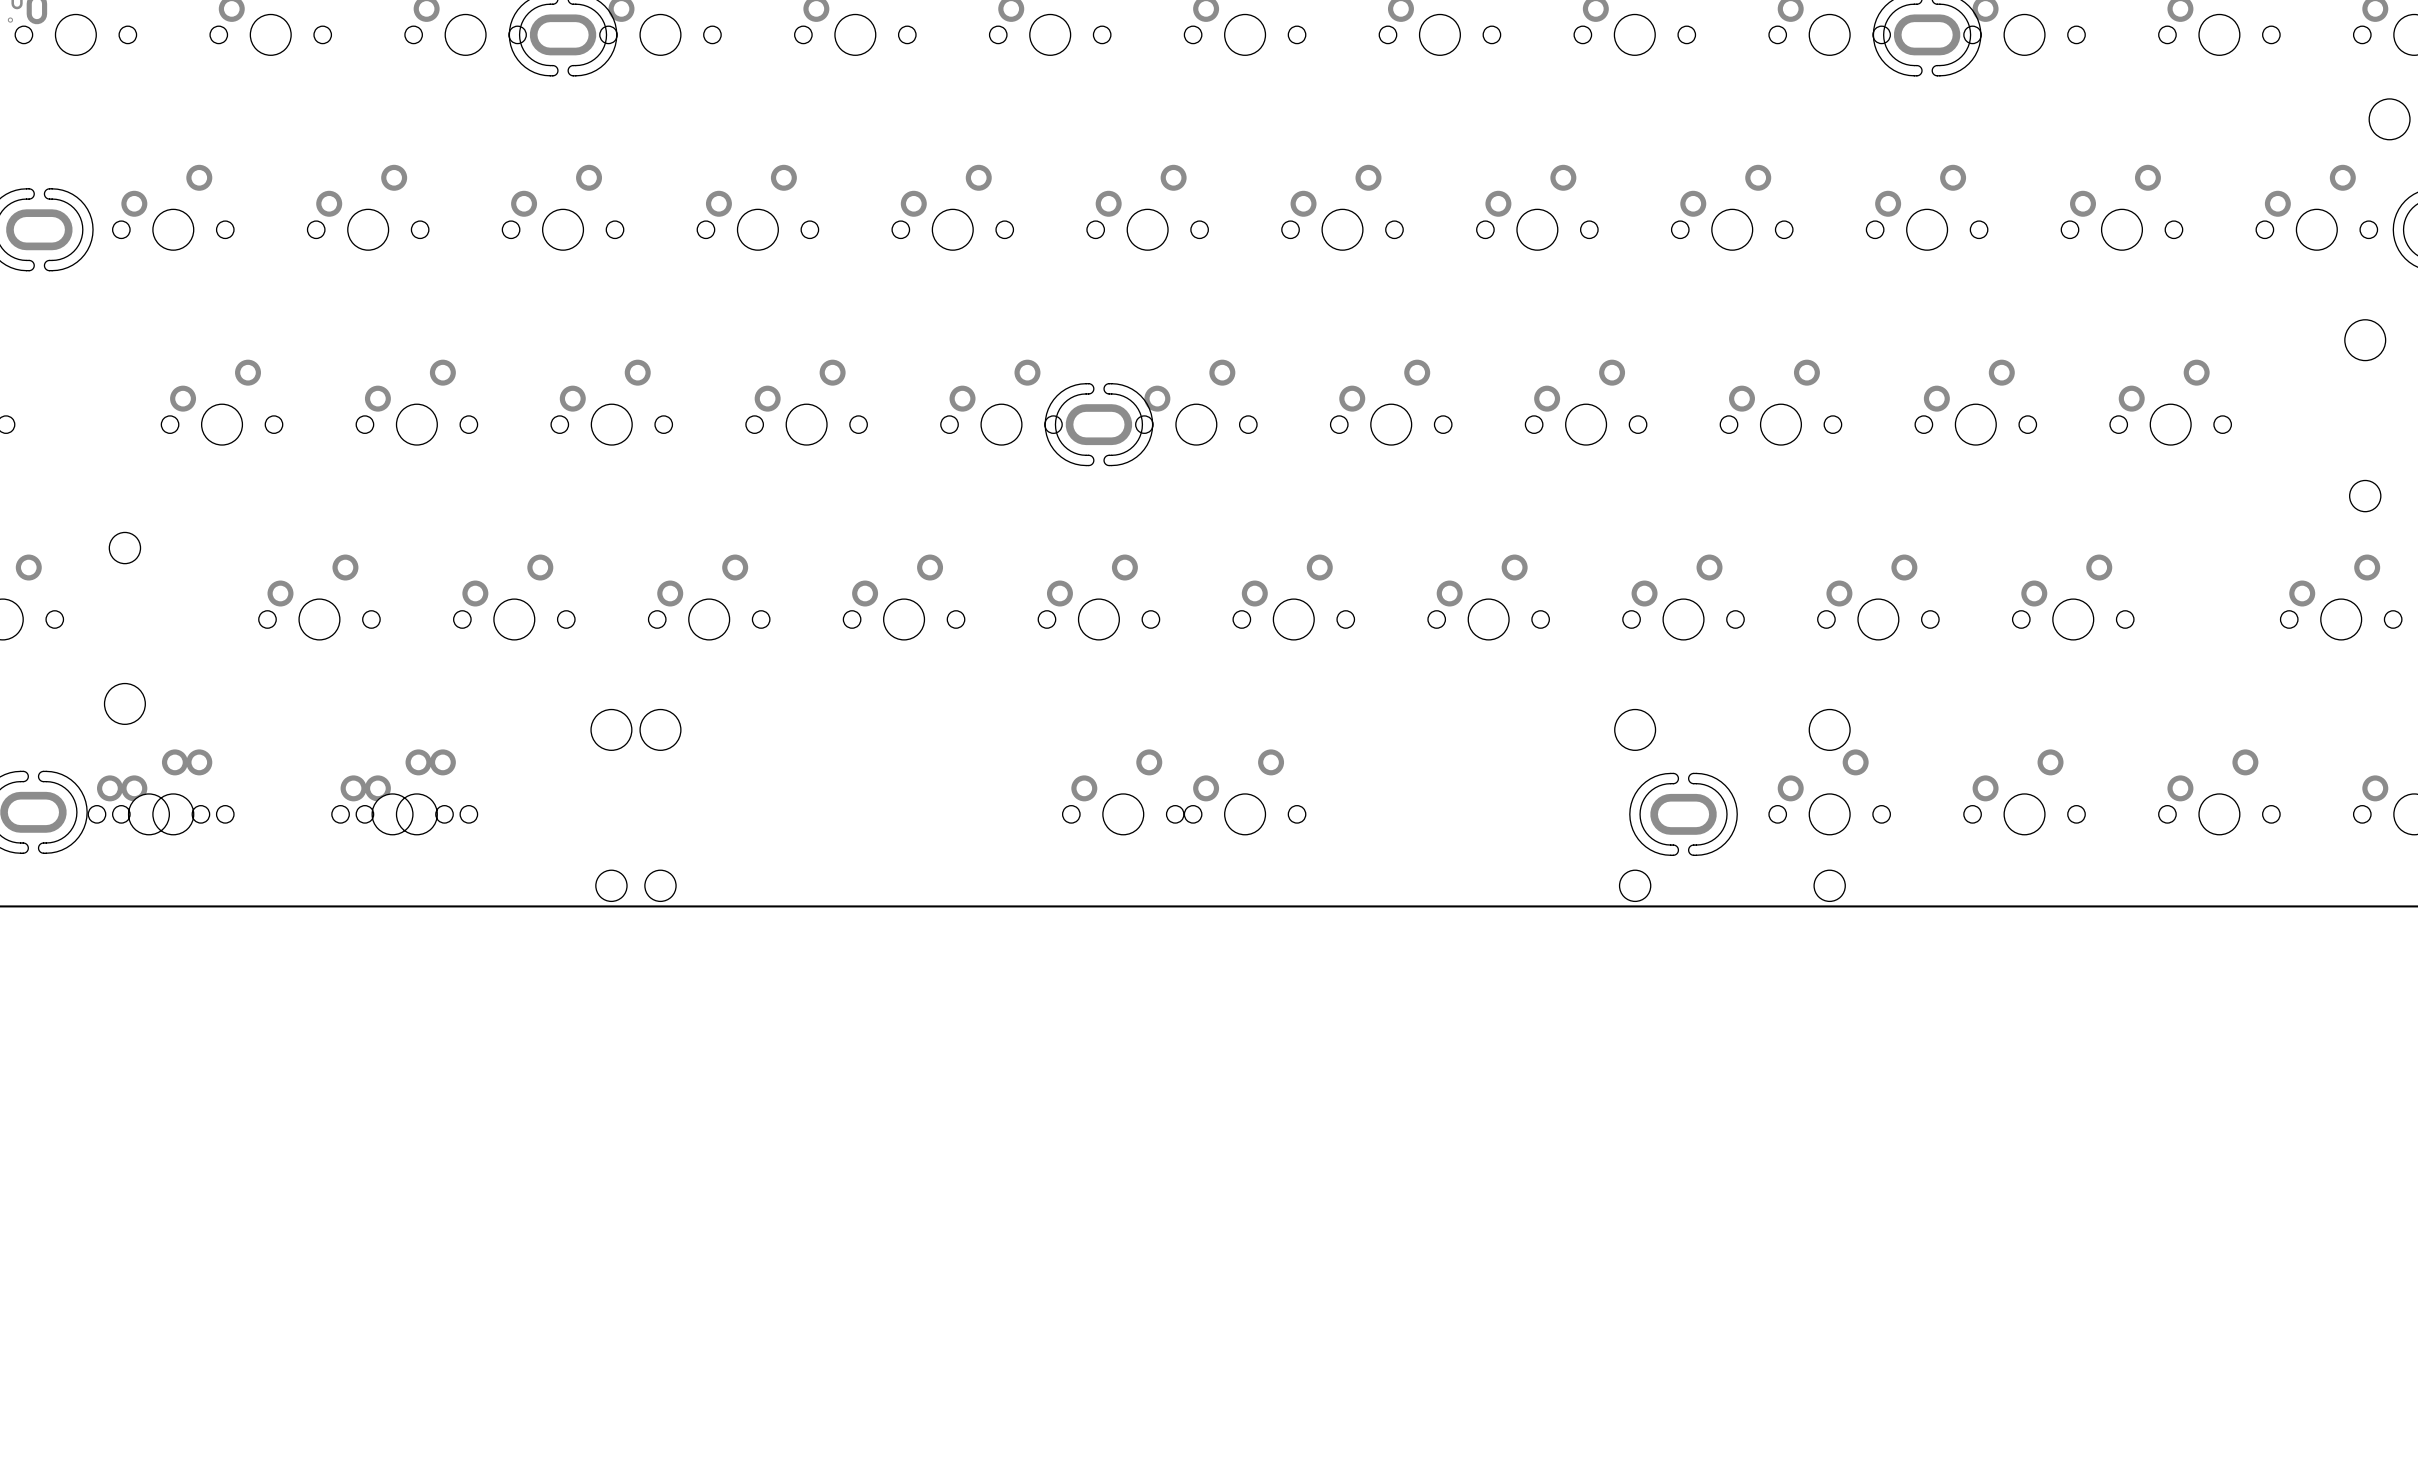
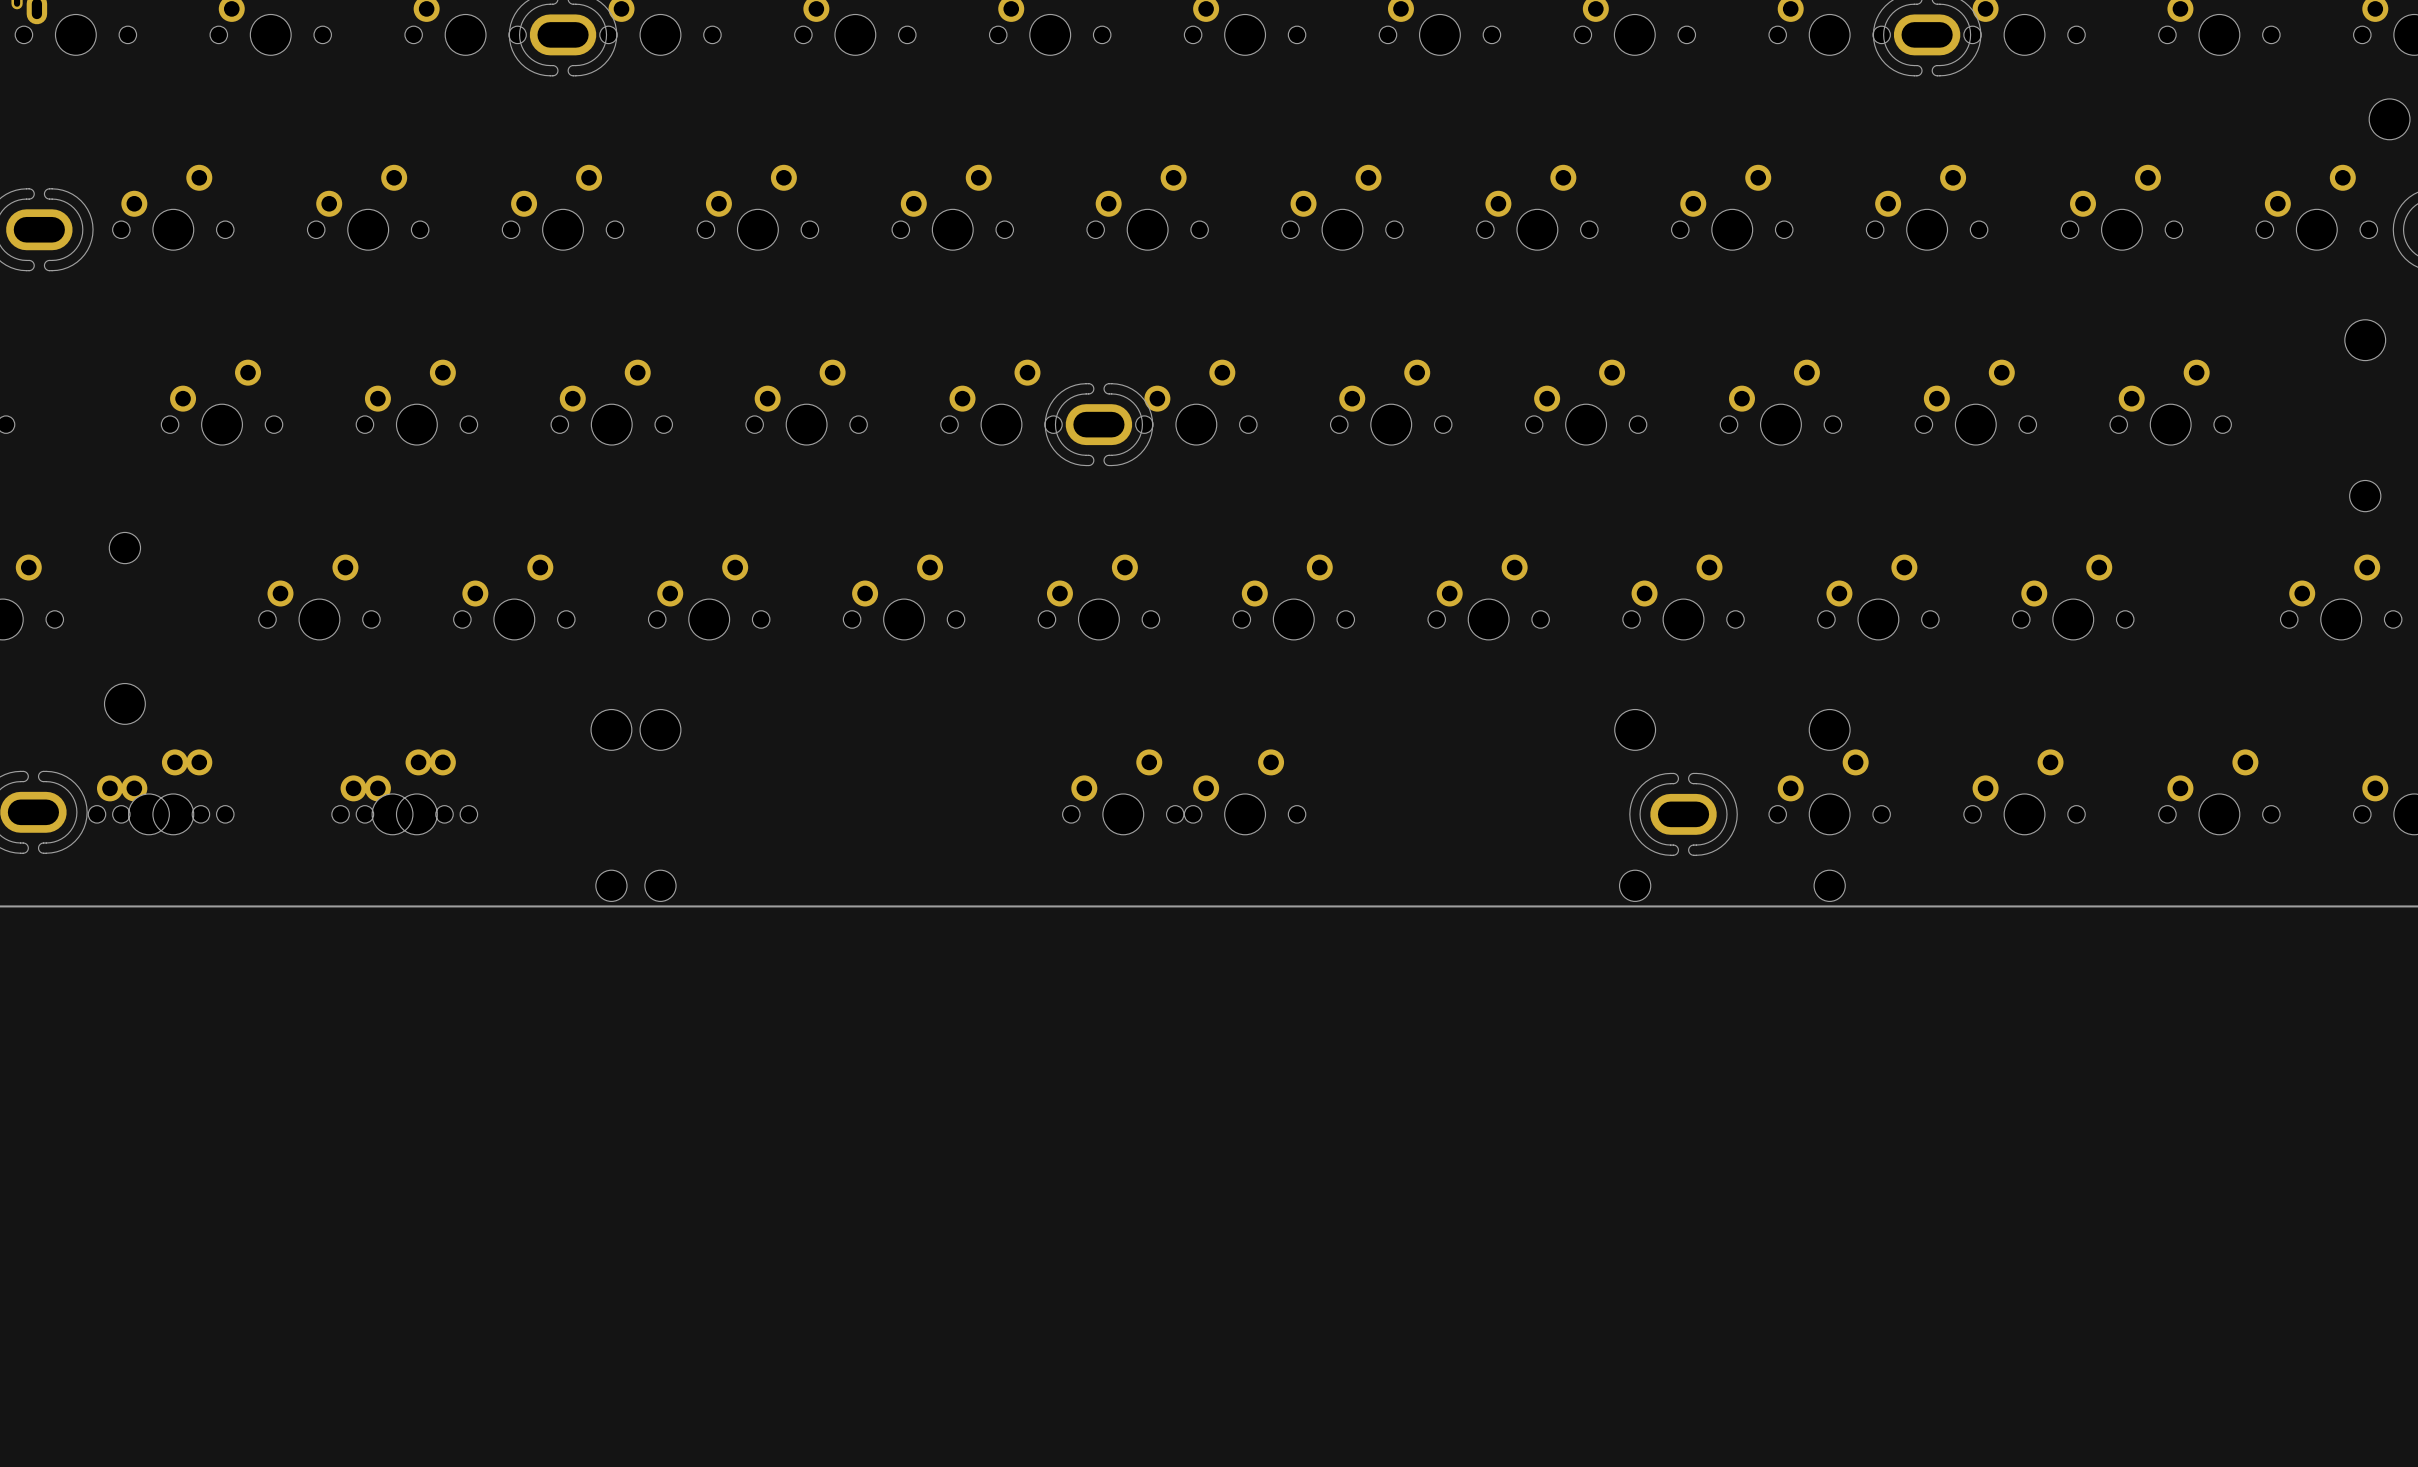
via: (10, 20) -> none

